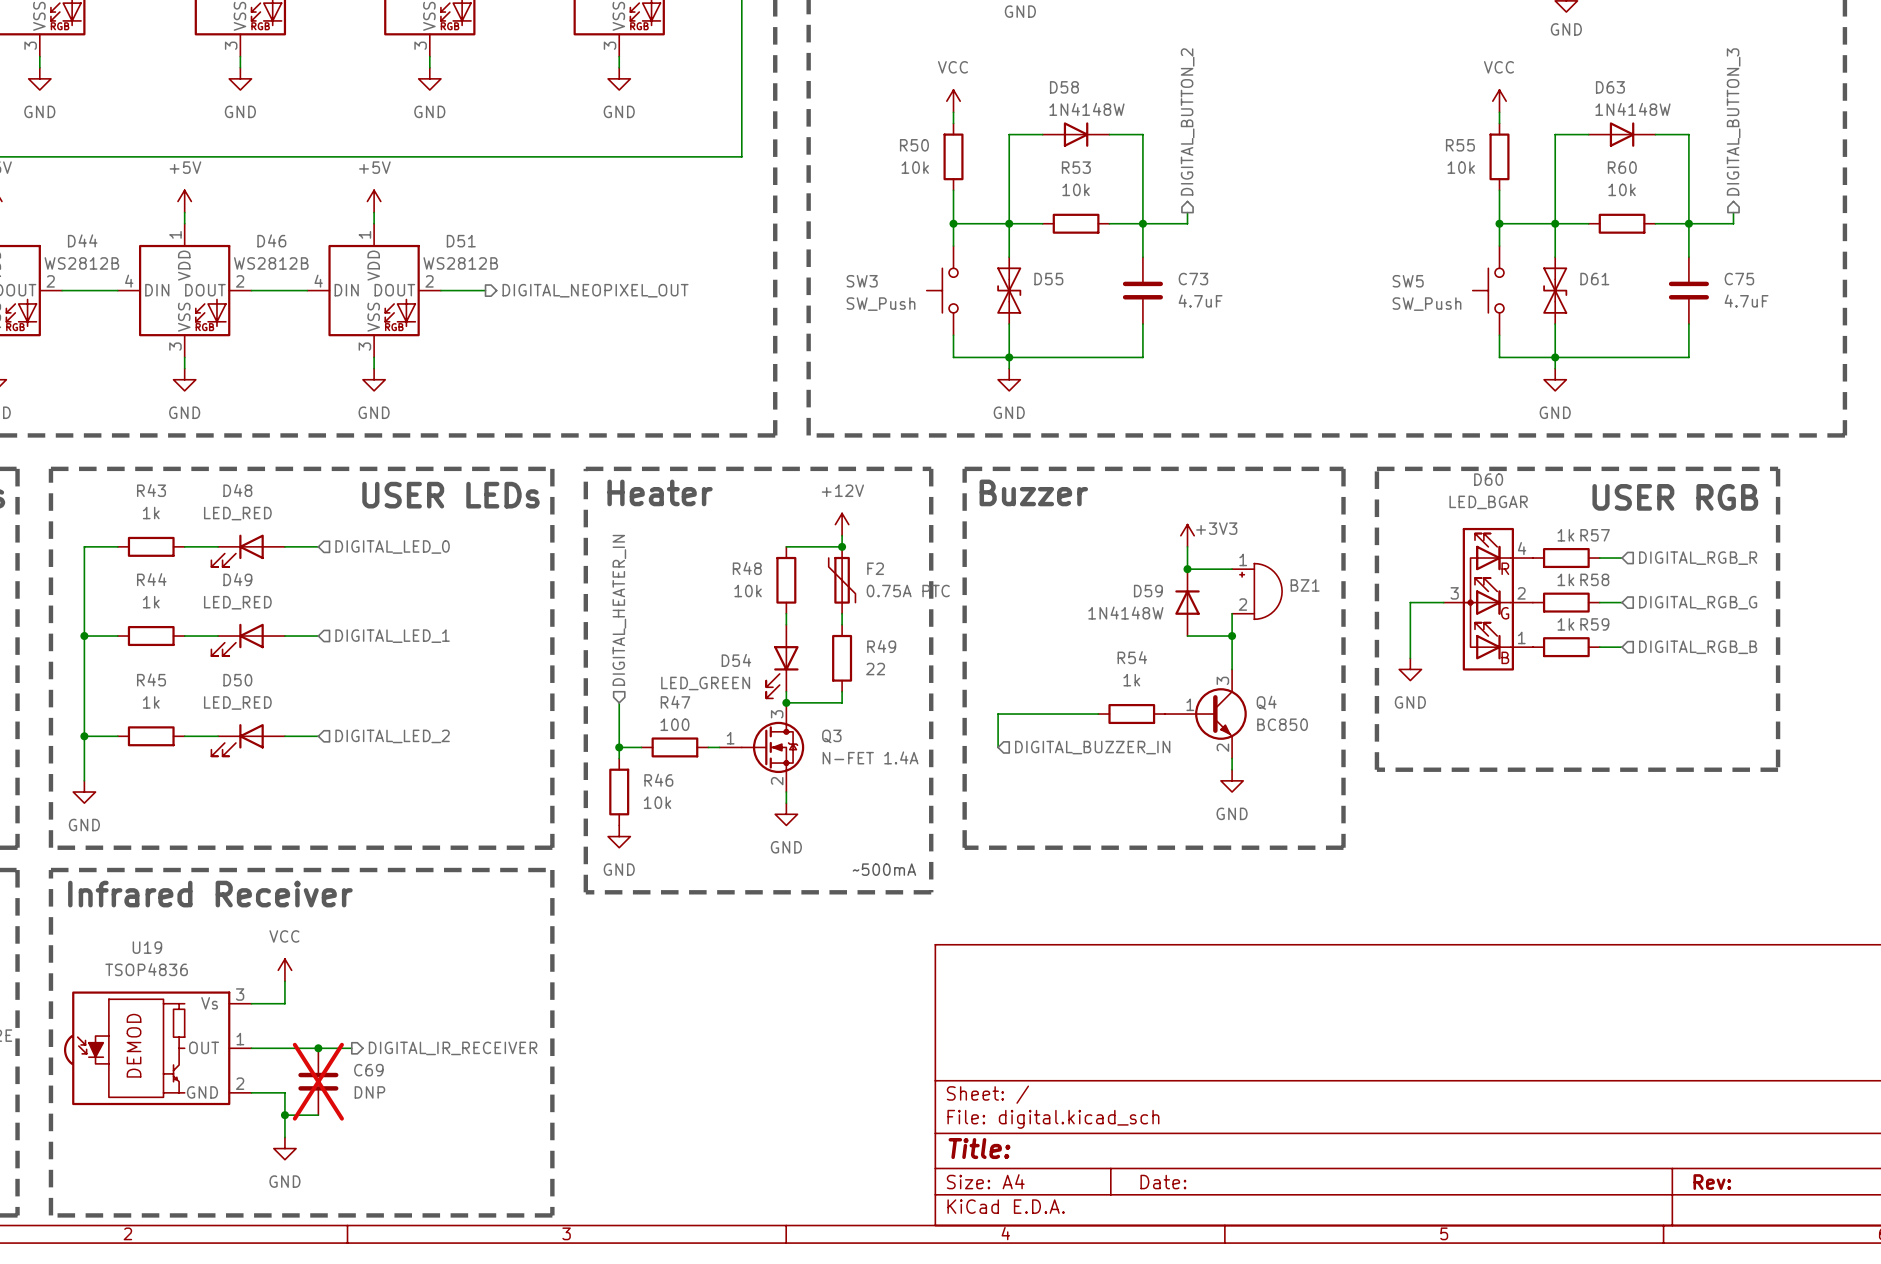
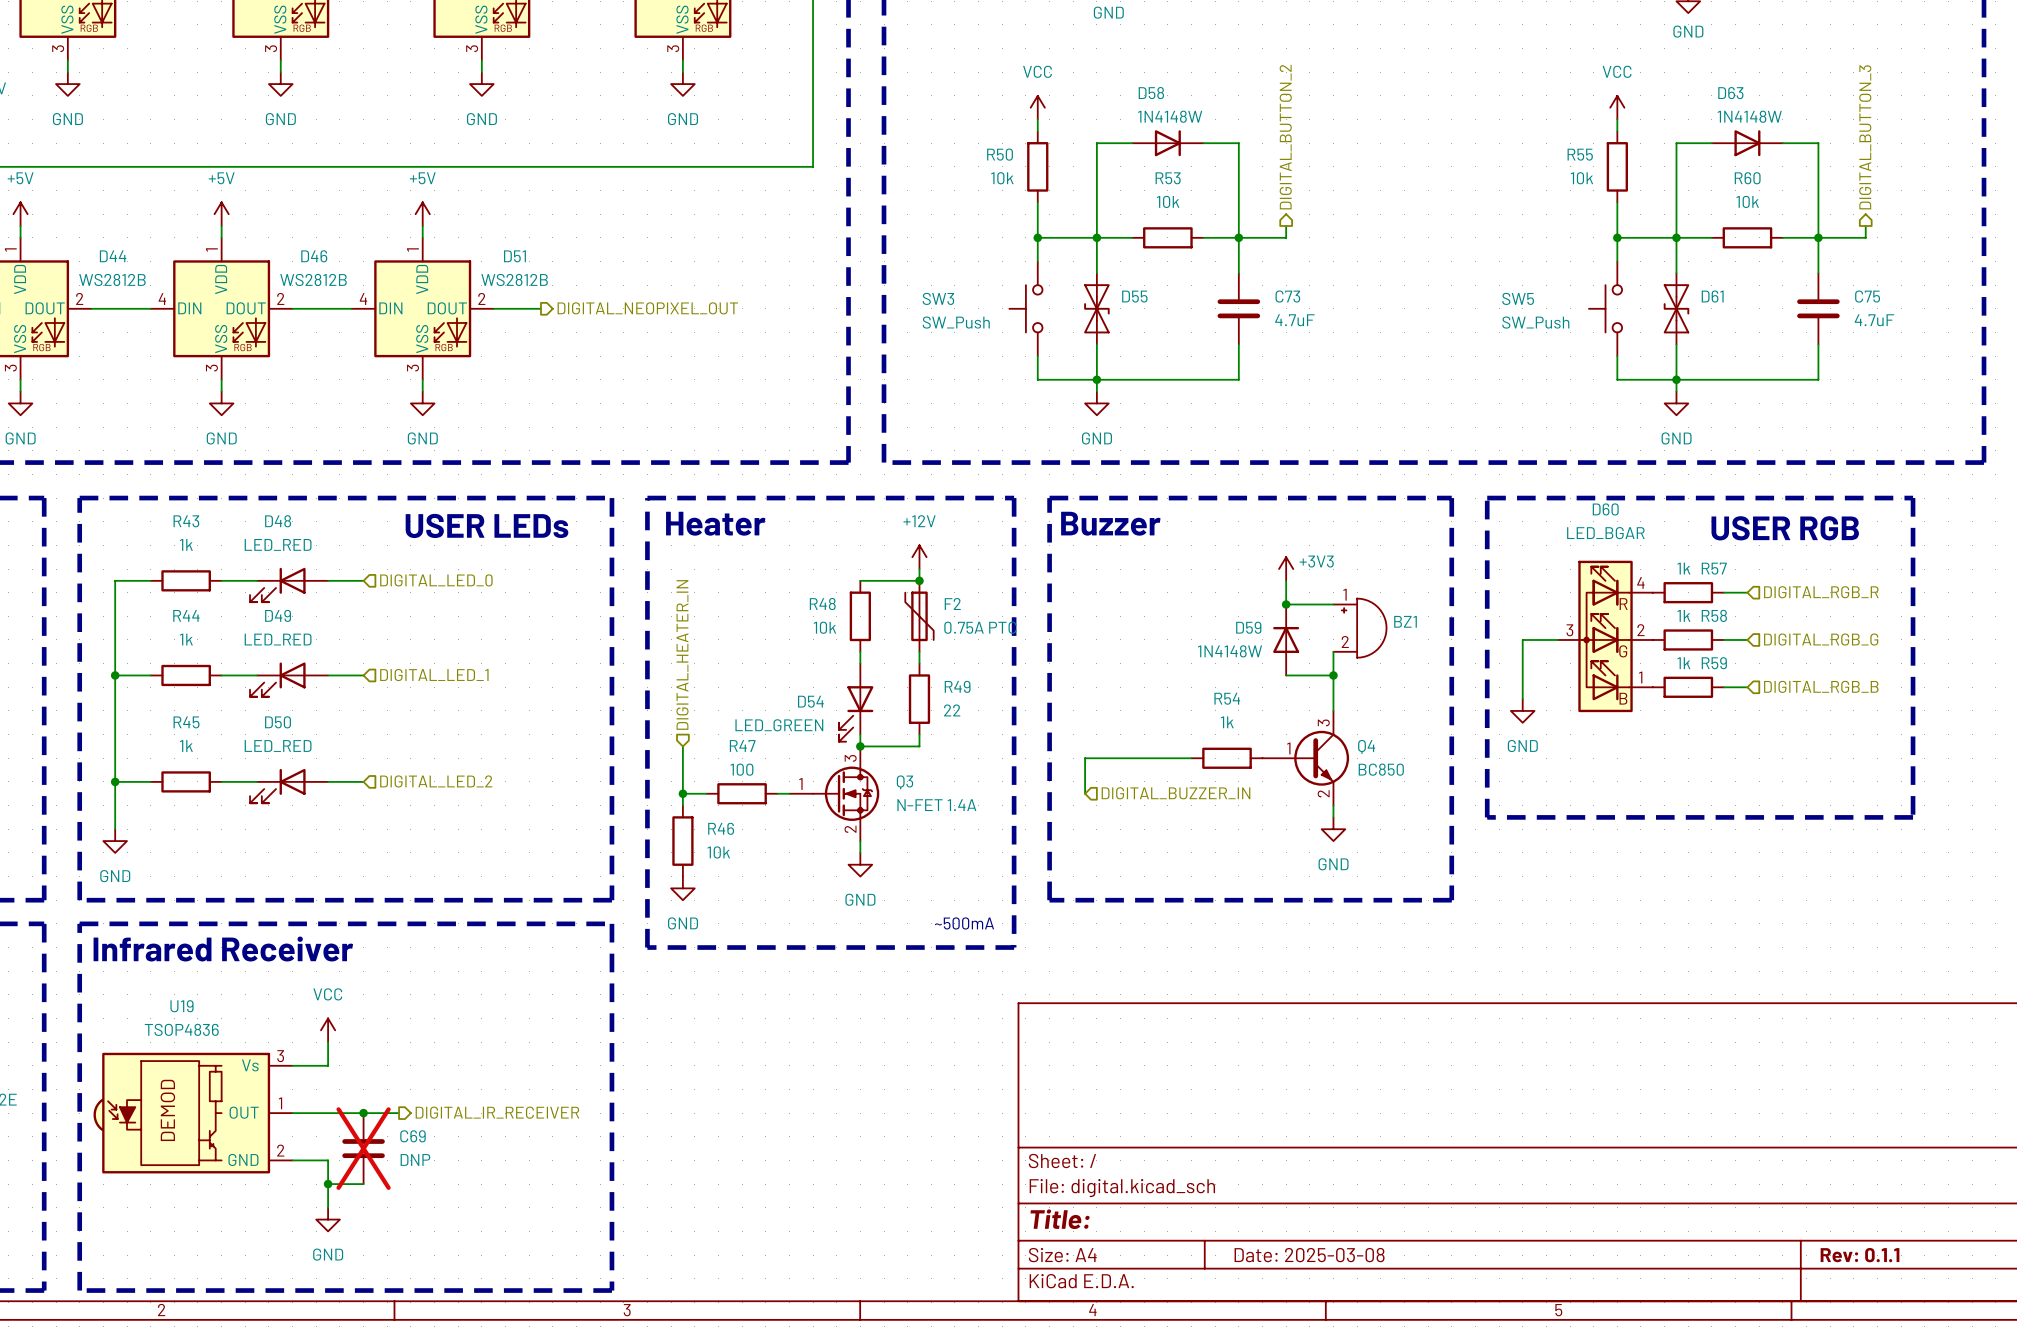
title block: Date: (1163, 1182) -> Date: 2025-03-08 (1309, 1255)
title block: Rev: (1712, 1182) -> Rev: 0.1.1 (1860, 1255)

